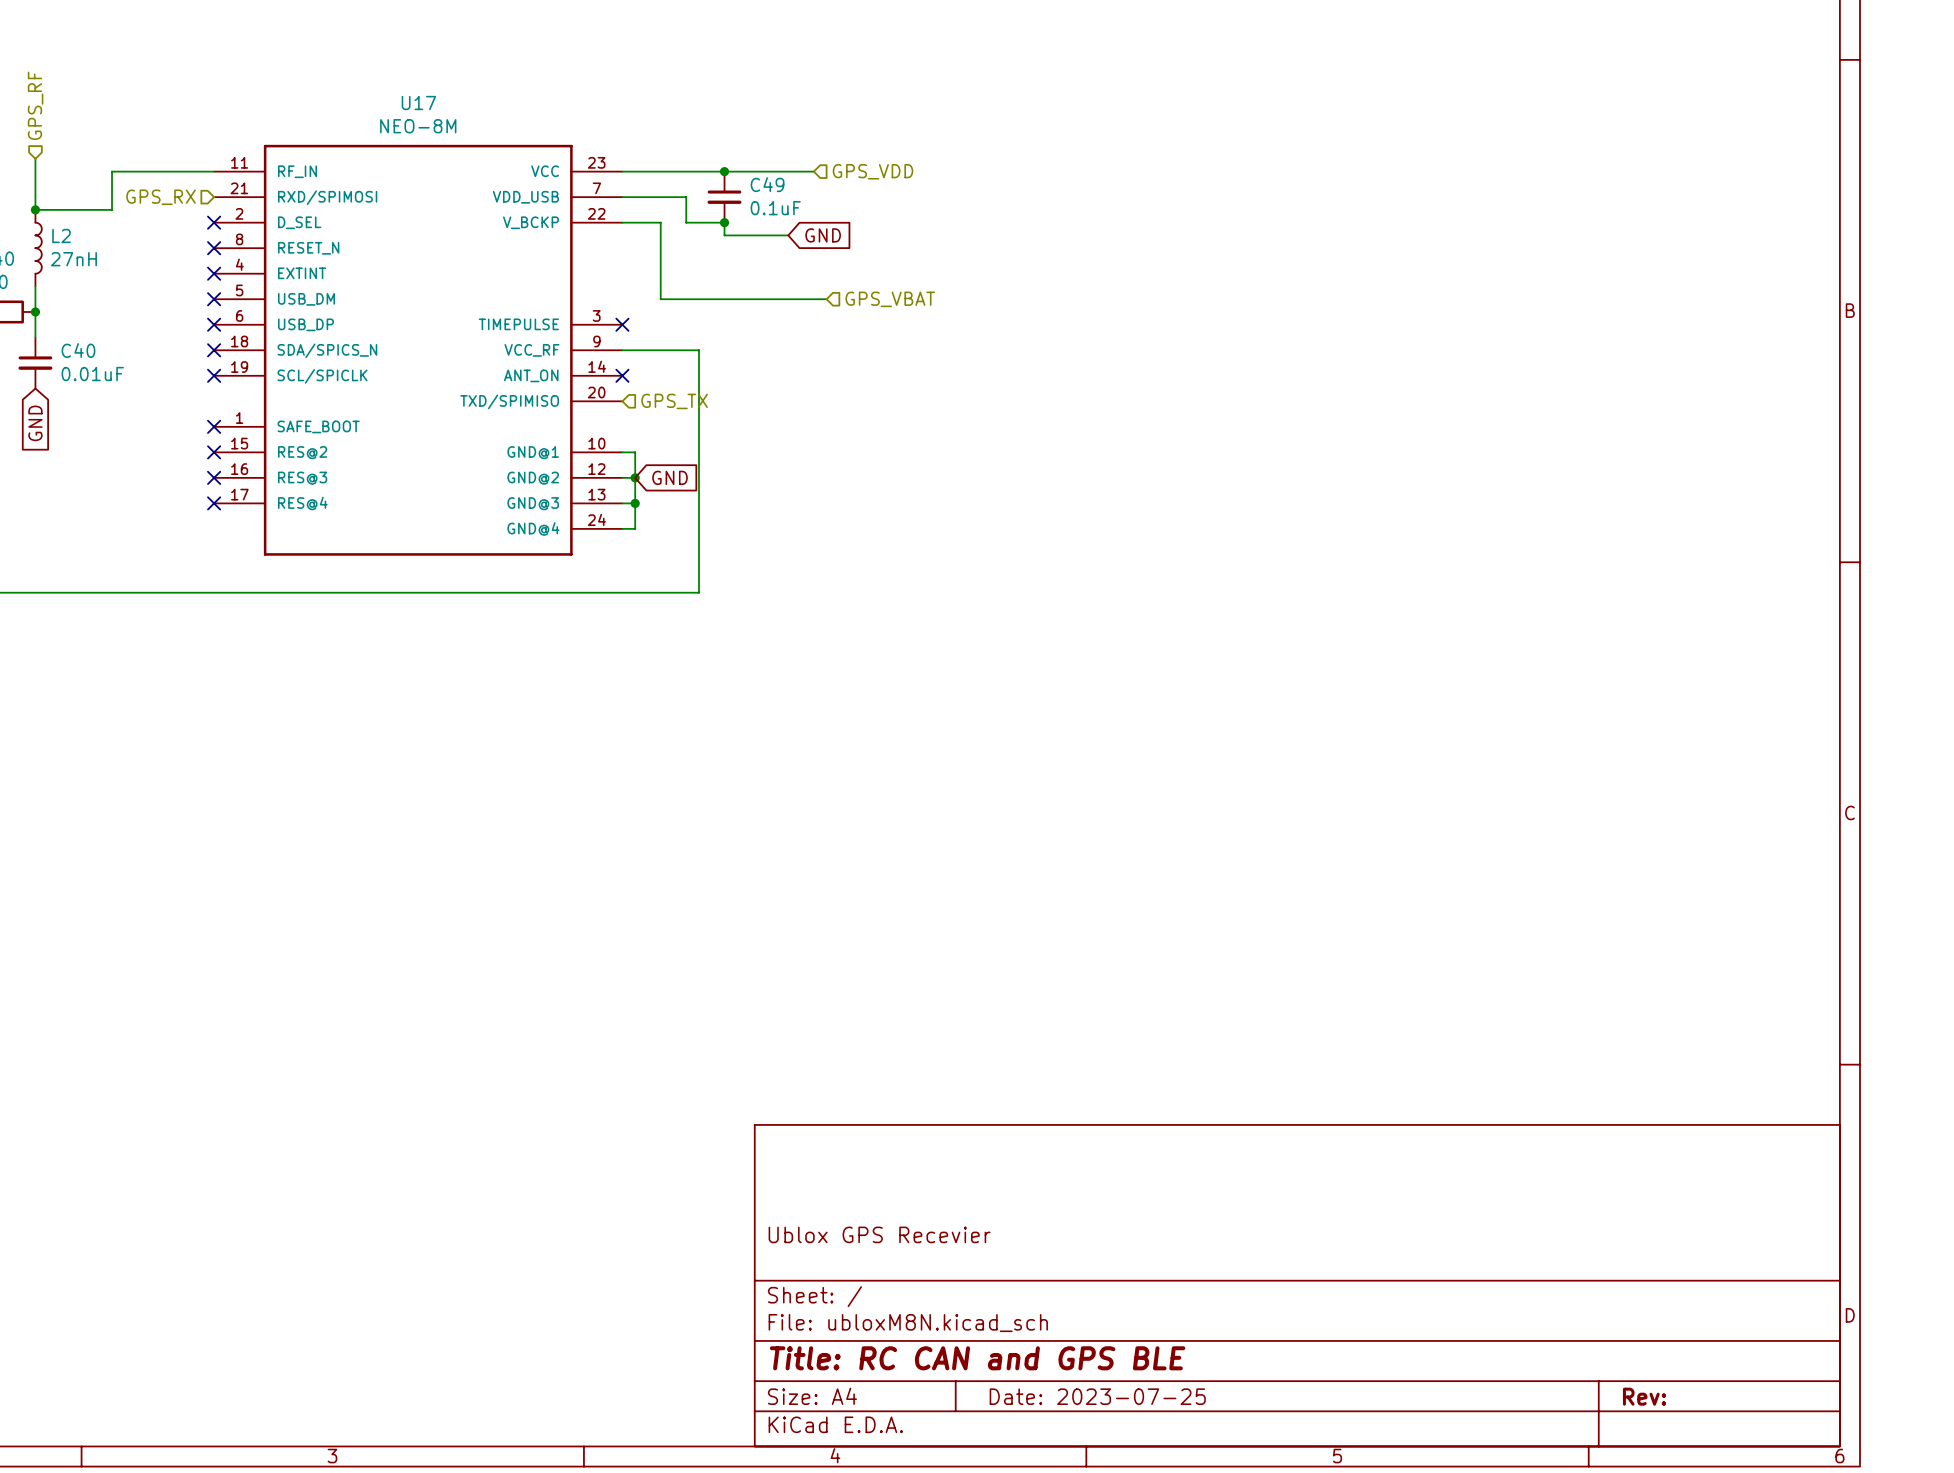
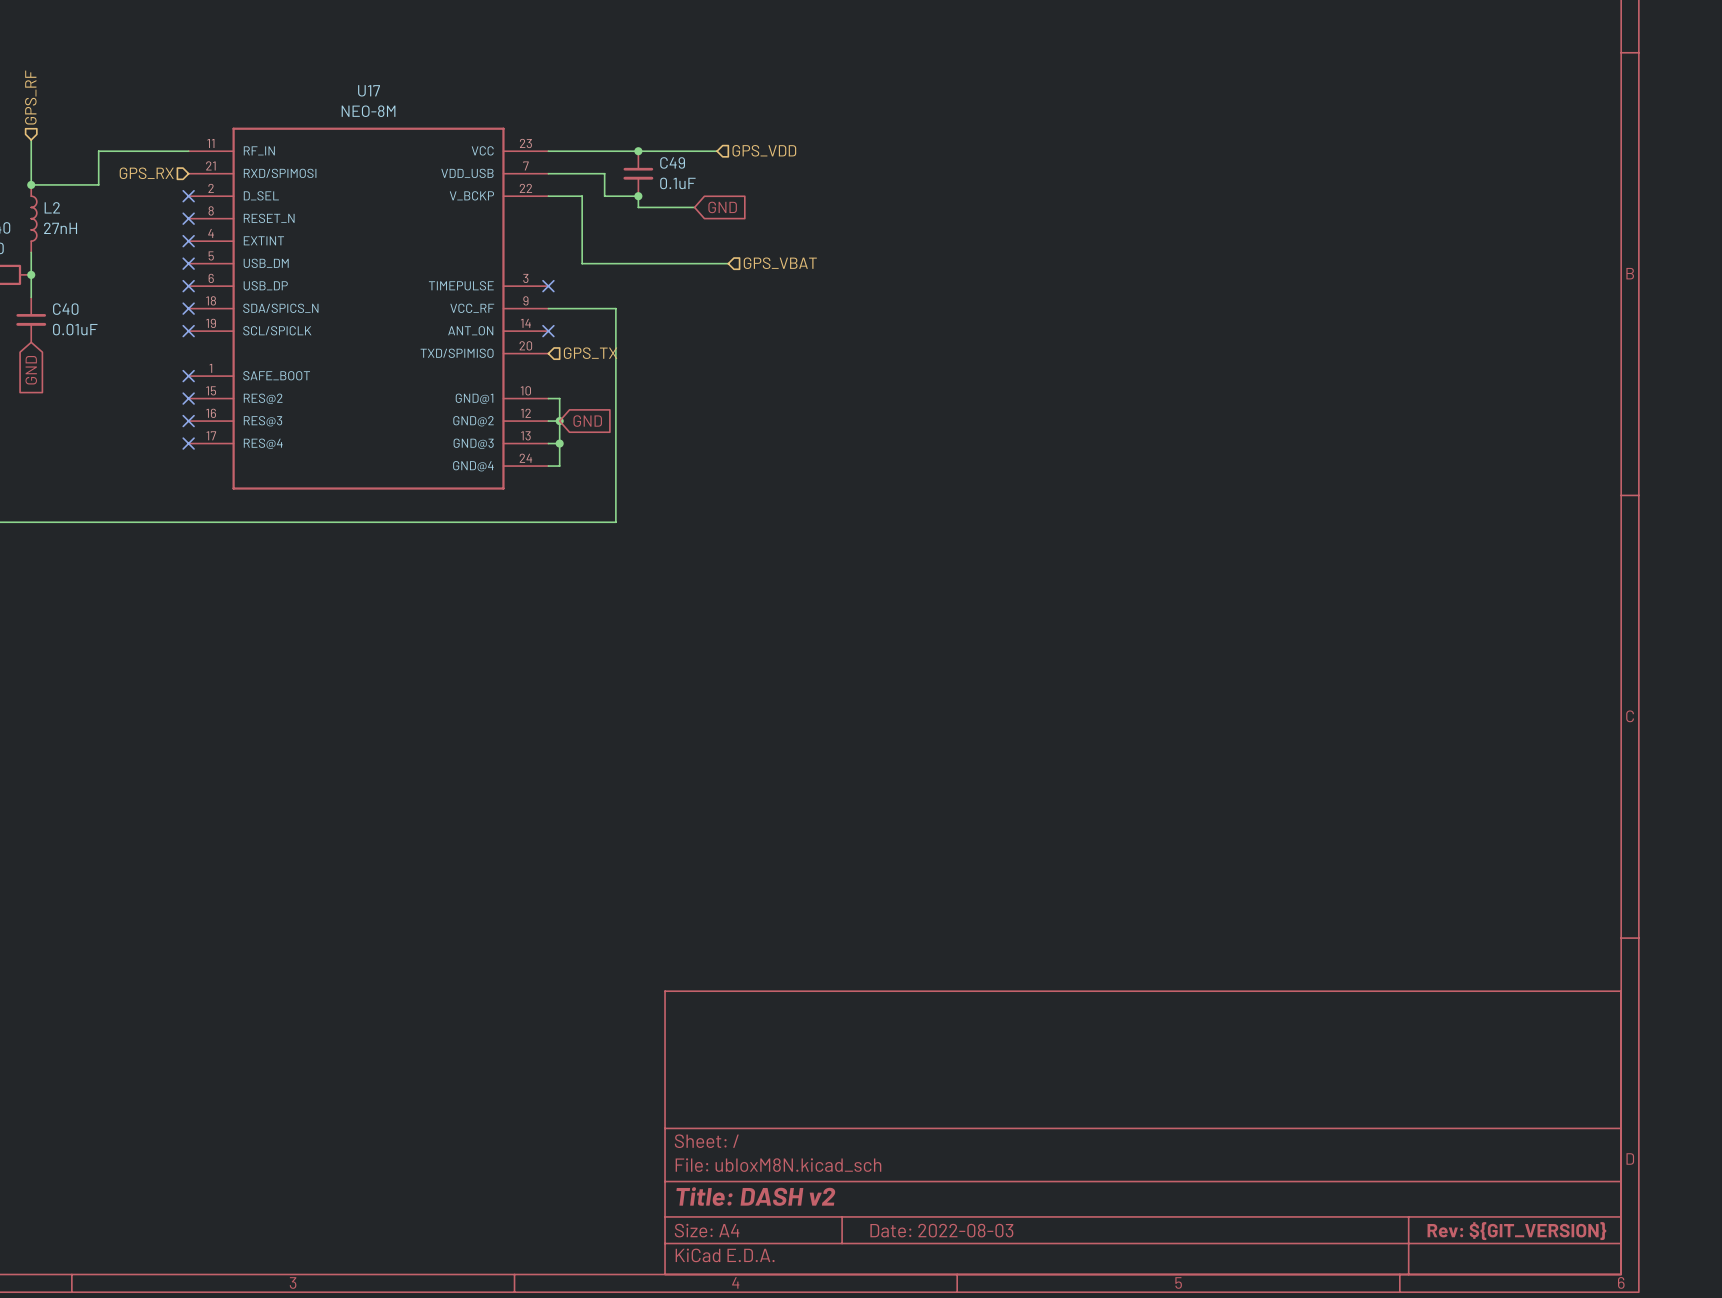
title block: Ublox GPS Recevier (879, 1234) -> none
title block: Title: RC CAN and GPS BLE (977, 1358) -> Title: DASH v2 (755, 1196)
title block: Date: 2023-07-25 (1097, 1396) -> Date: 2022-08-03 (941, 1230)
title block: Rev: (1644, 1396) -> Rev: ${GIT_VERSION} (1516, 1231)

